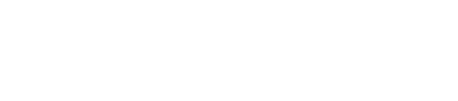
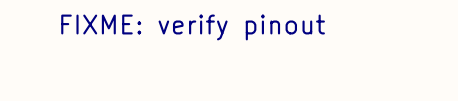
text: none -> FIXME: verify pinout (193, 27)

